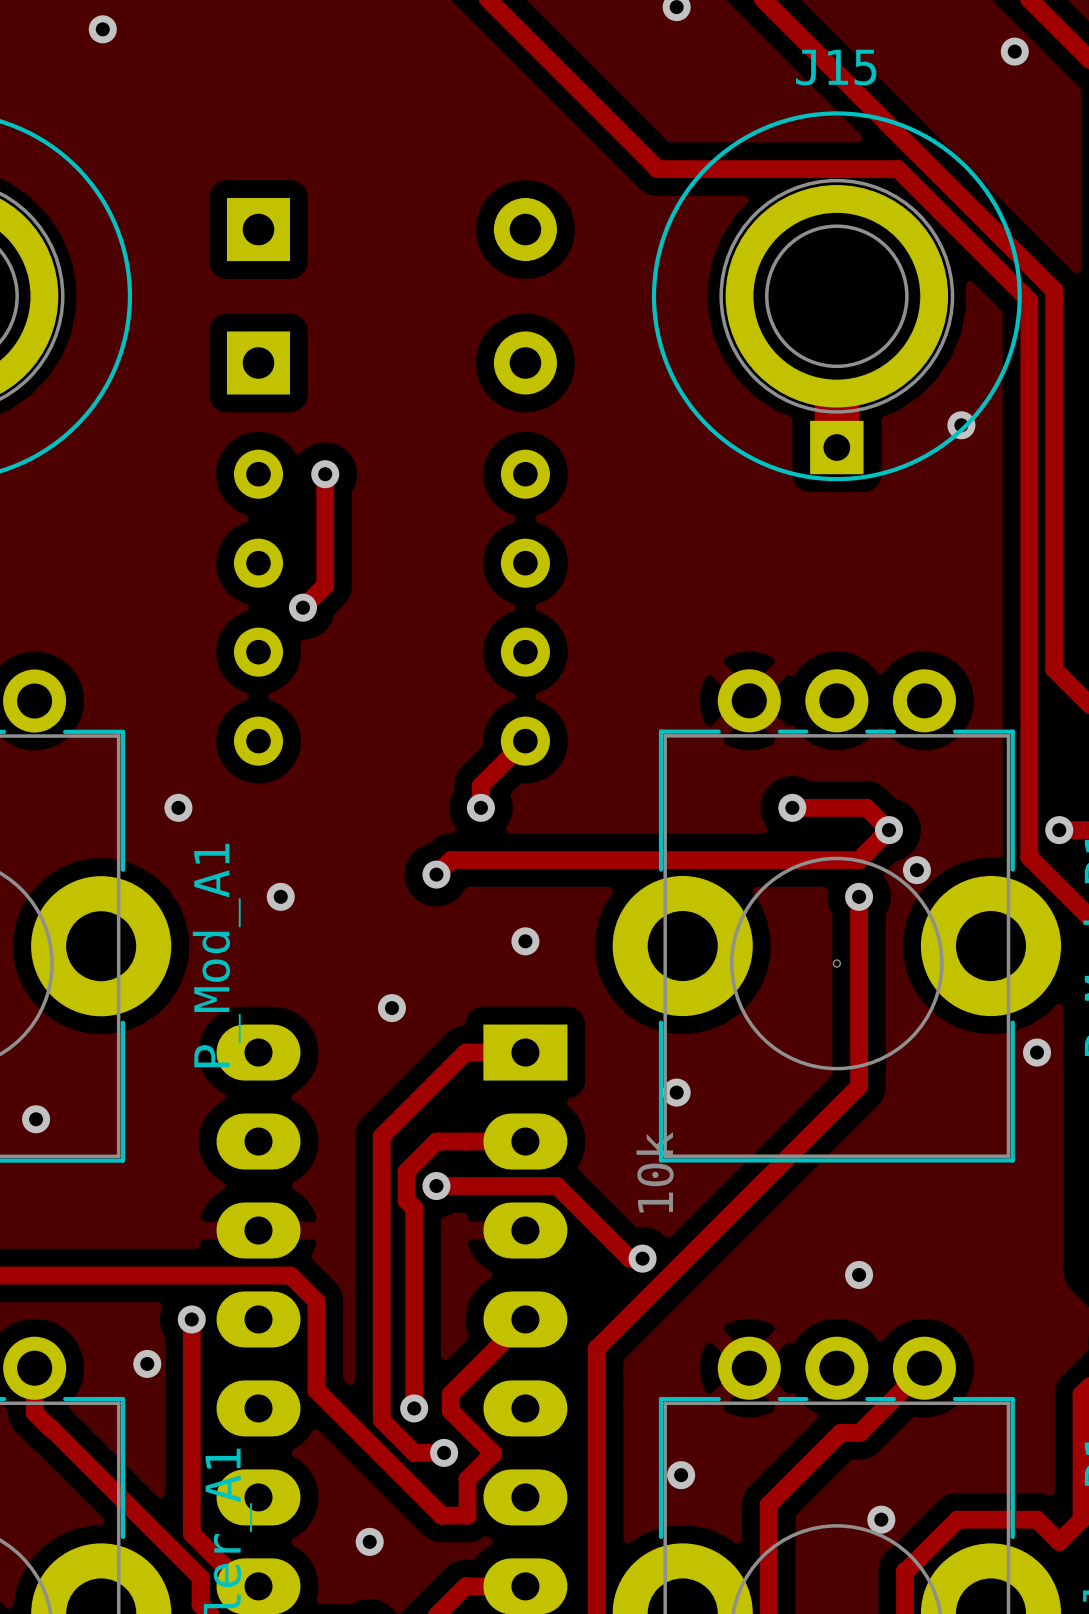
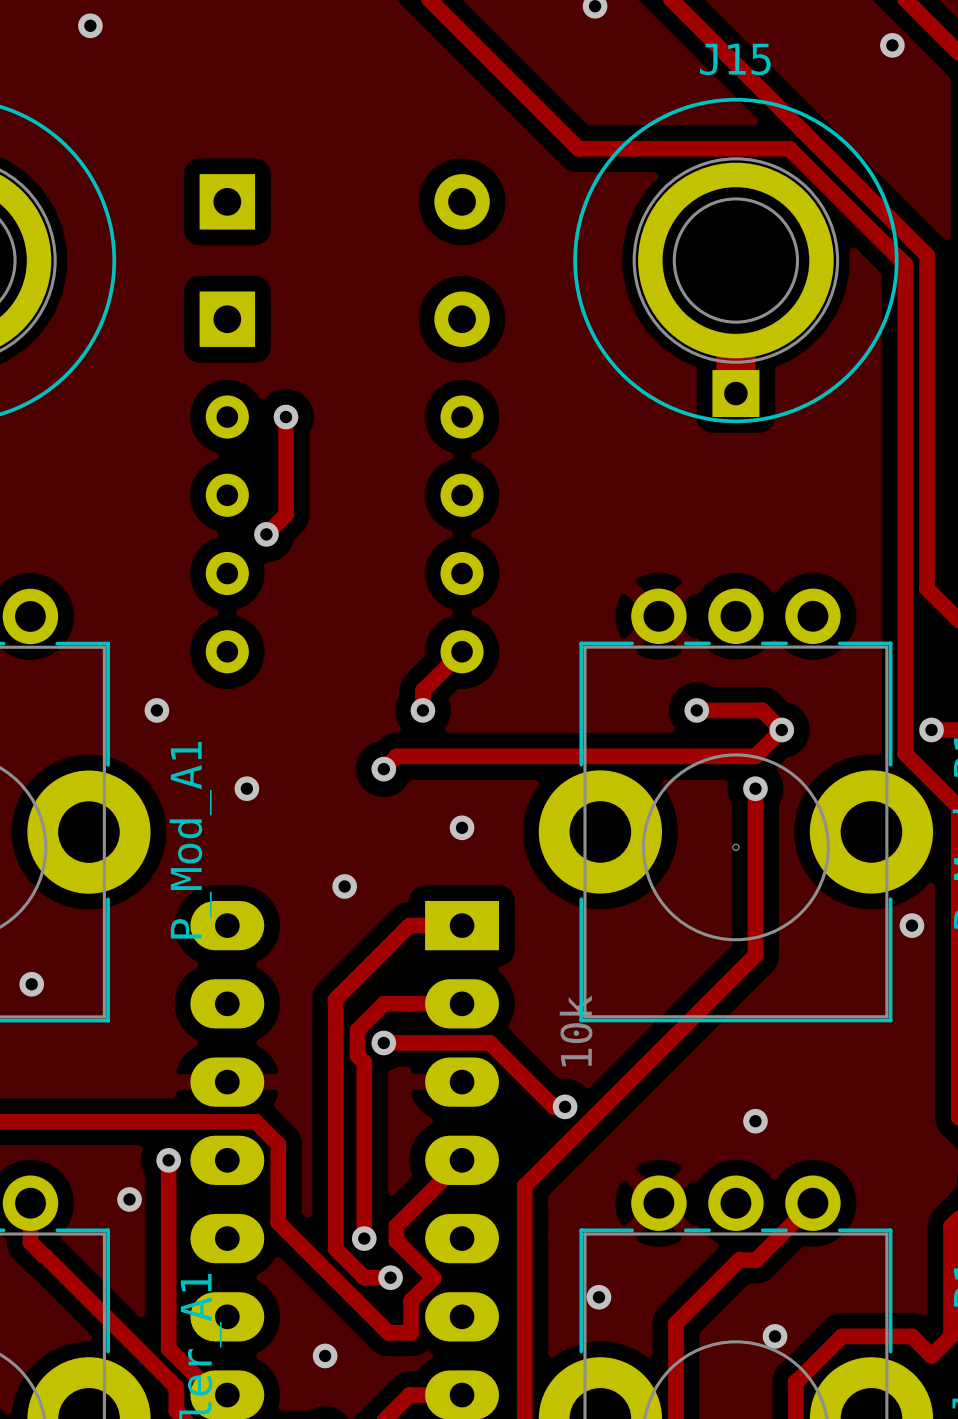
via: (961, 425) -> none
via: (916, 870) -> none
via: (676, 1092) -> none

